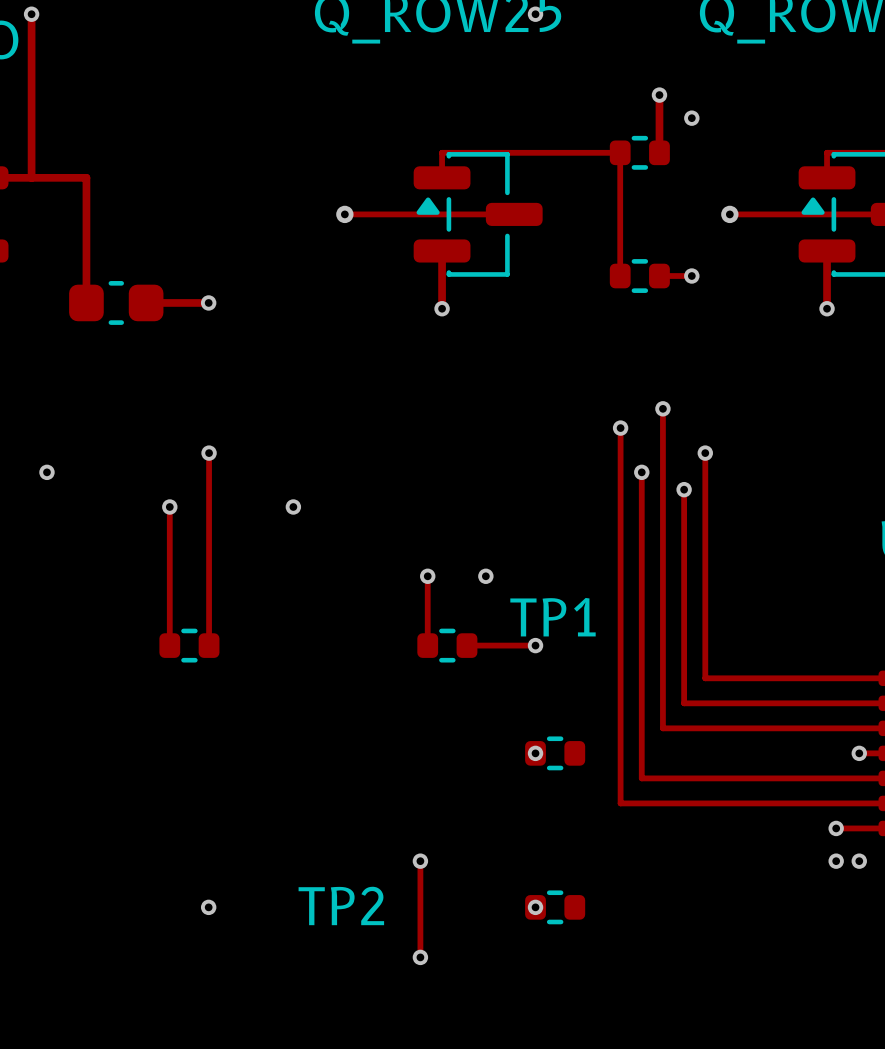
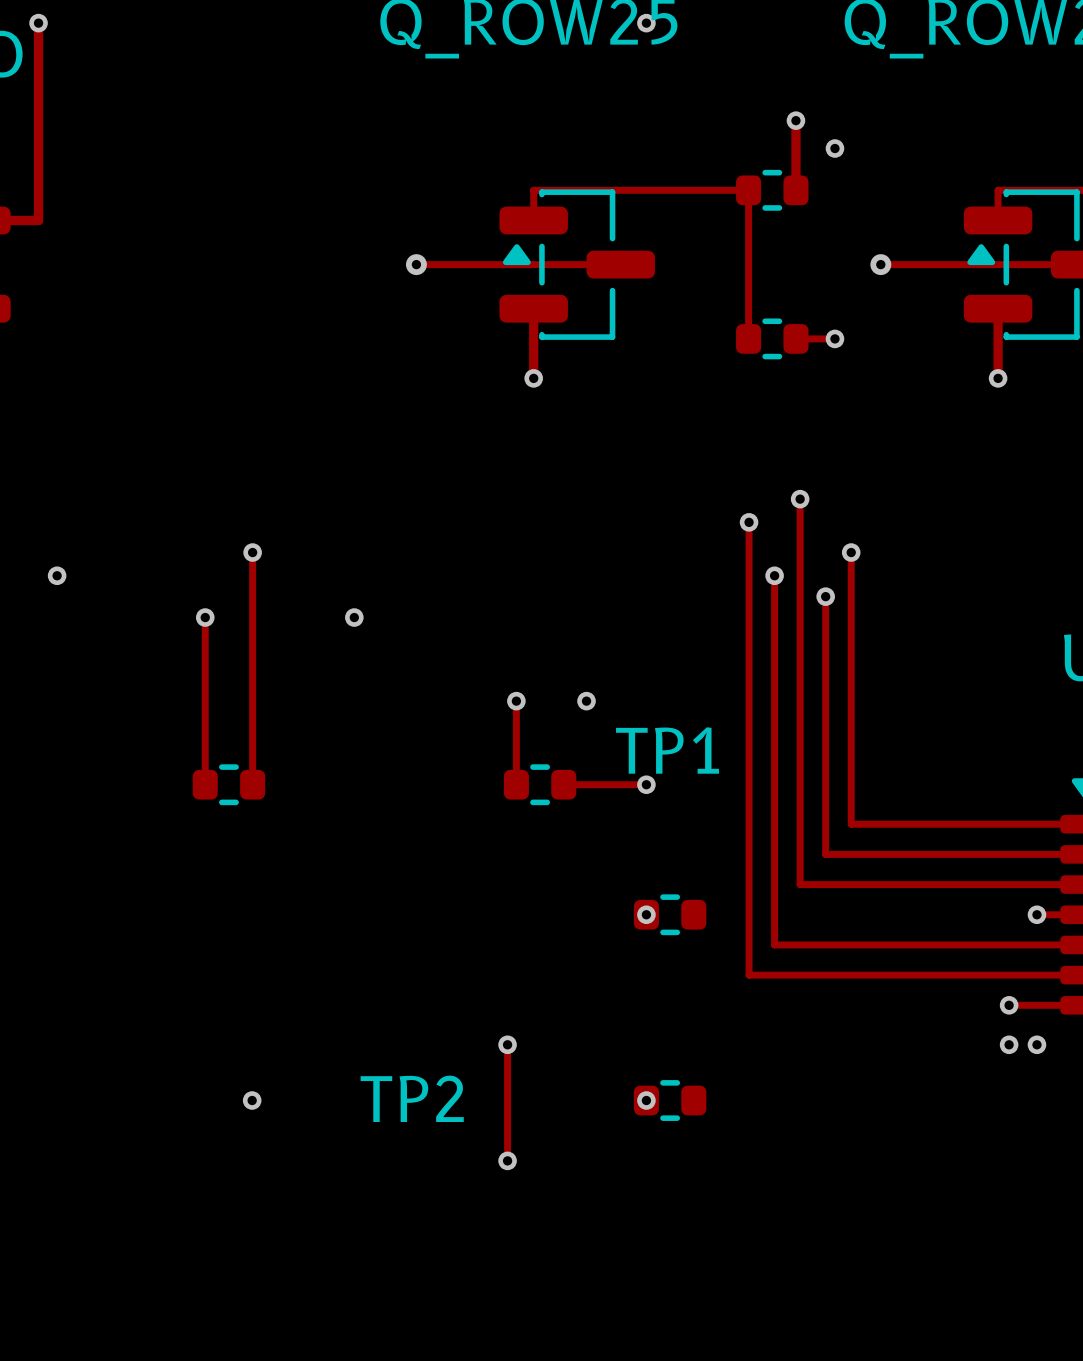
top track: (31, 177) (86, 177) (86, 302) -> none
part: (116, 302) -> none
top track: (146, 302) (208, 302) -> none
via: (208, 302) -> none

